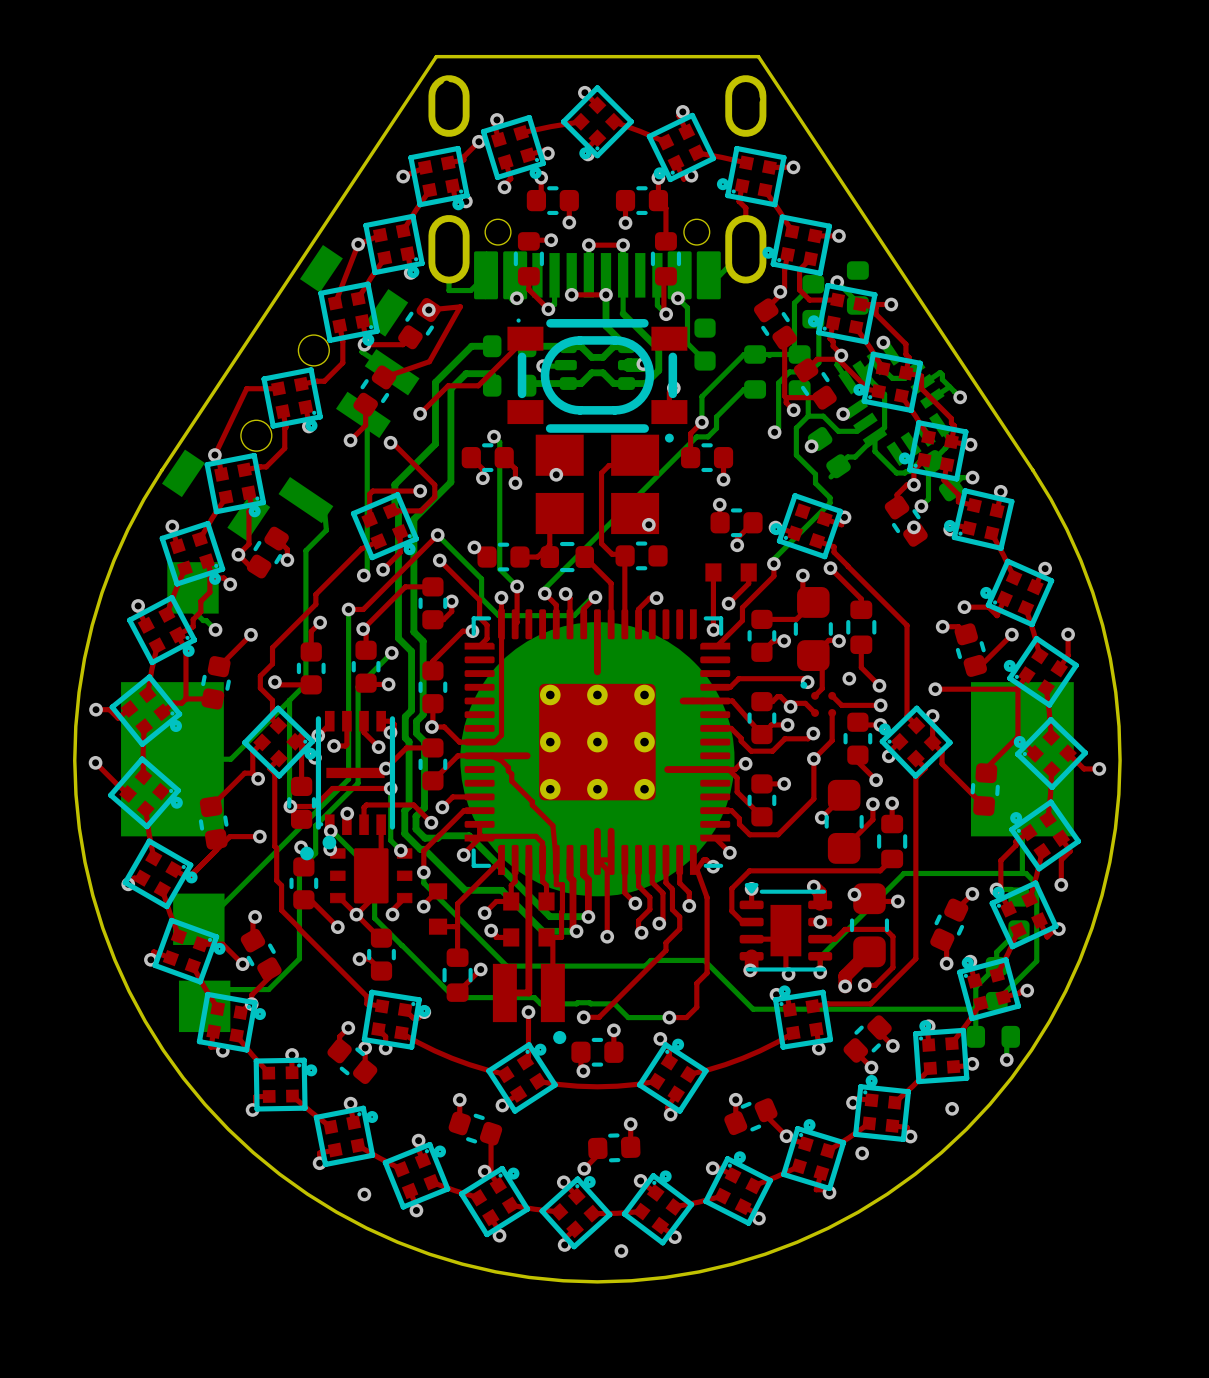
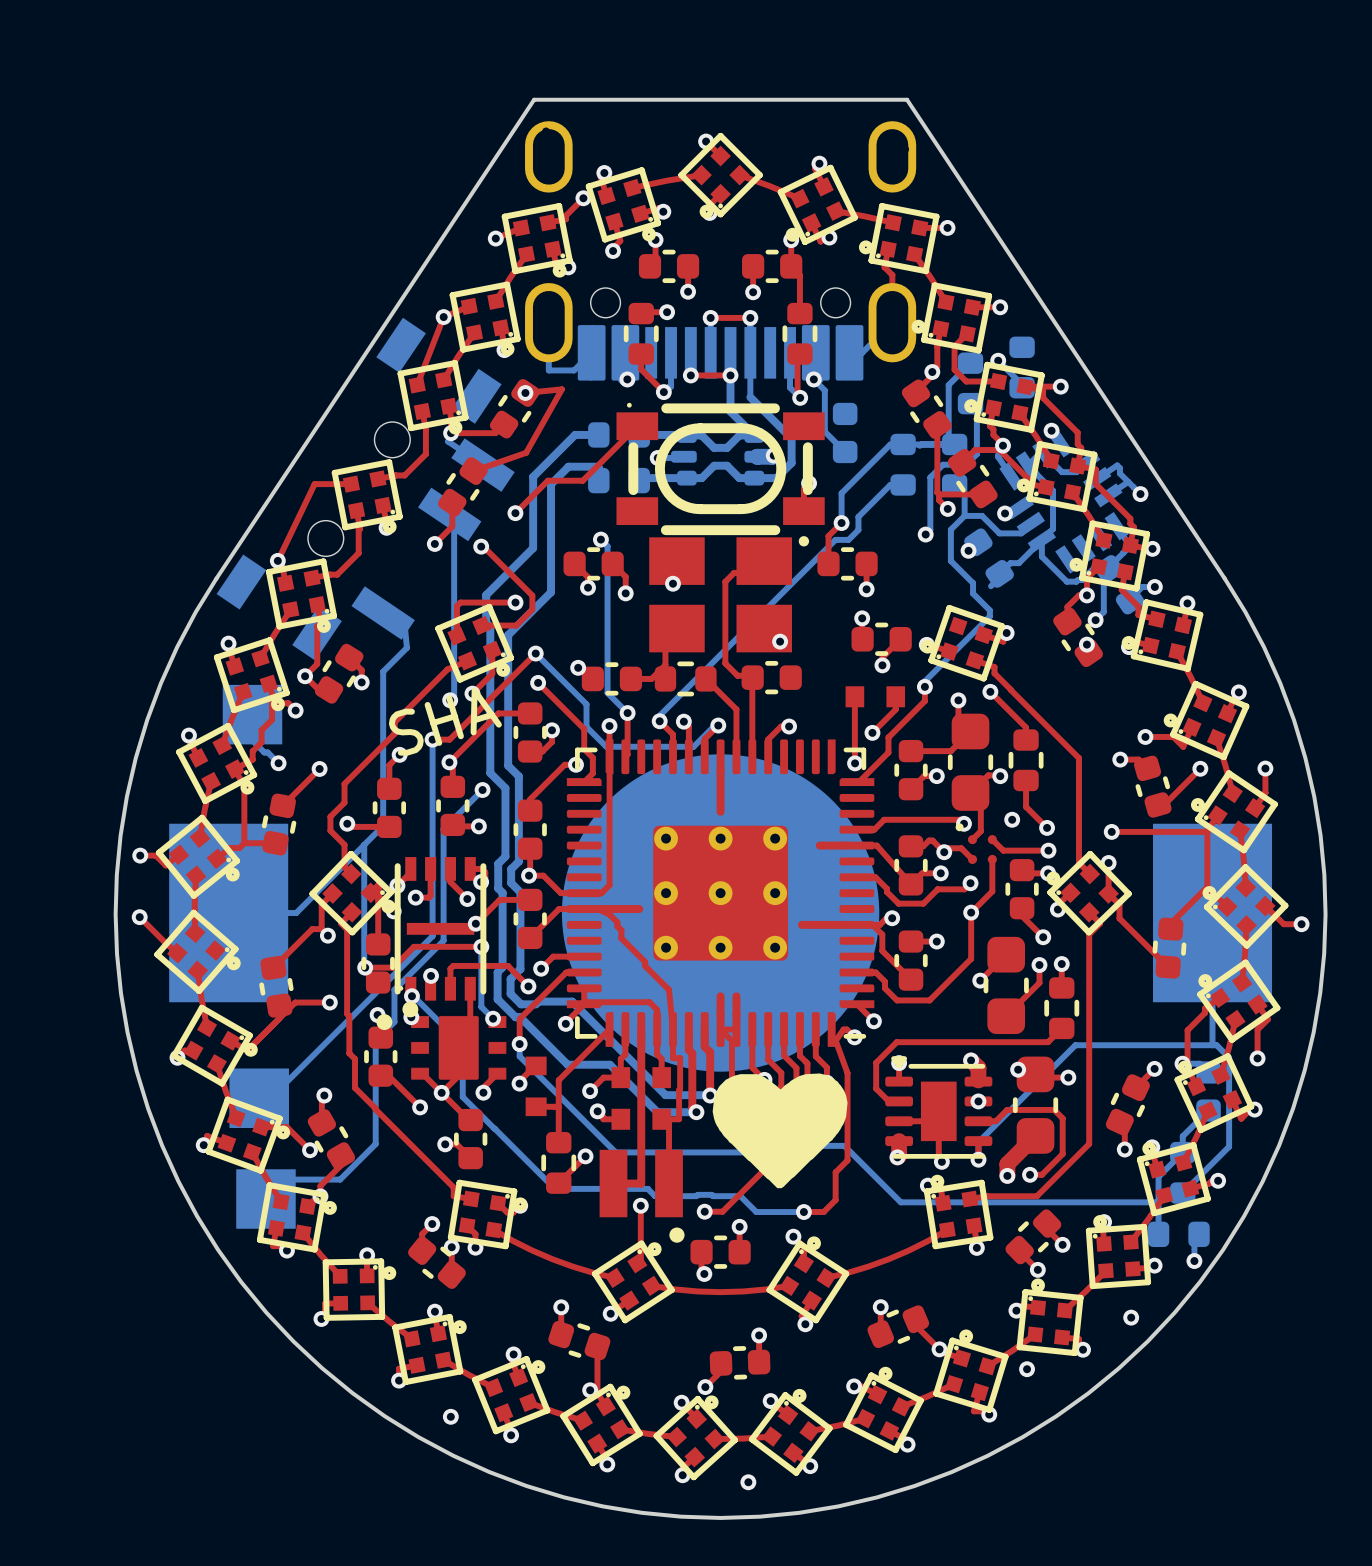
text: none -> SHA (445, 721)
drawing: none -> [712, 1073, 848, 1189]

